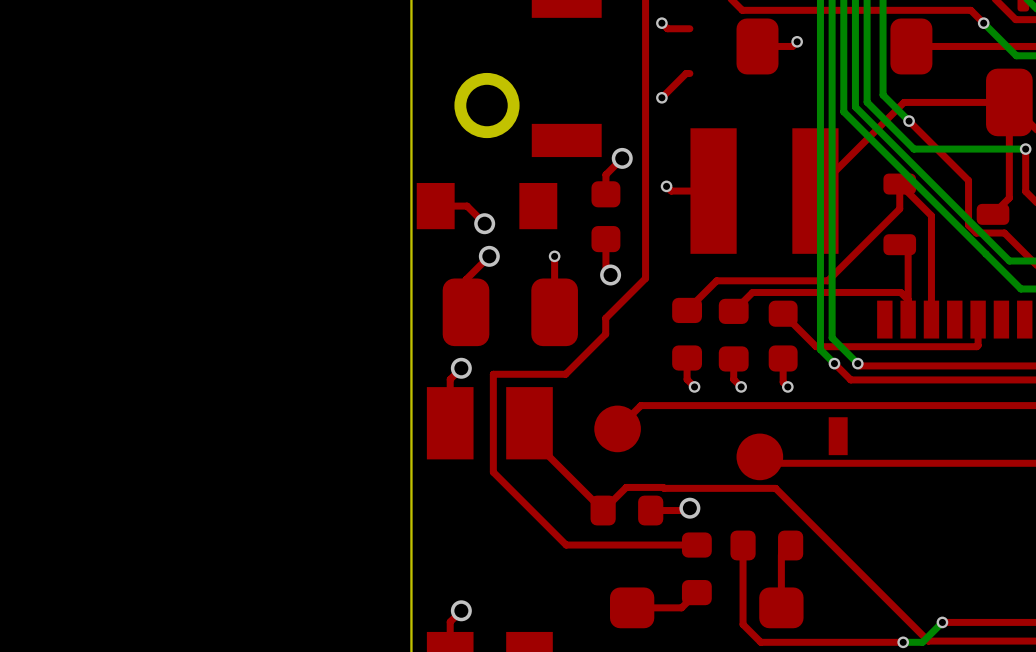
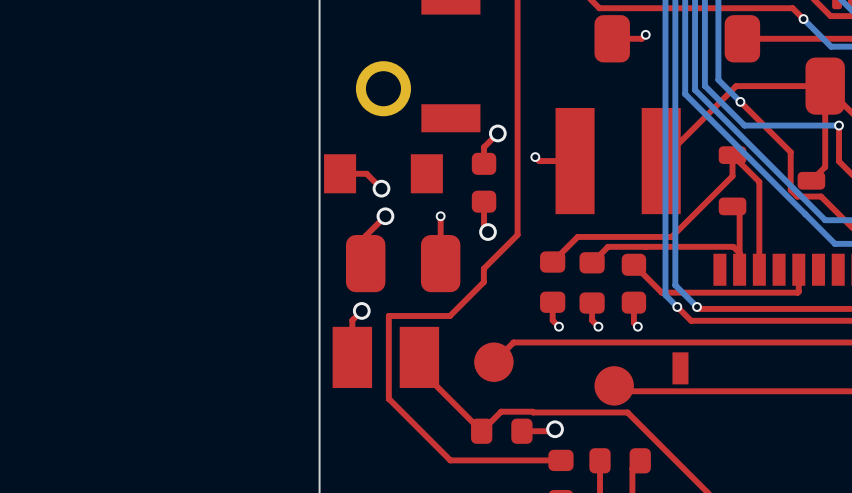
top track: (661, 23) (667, 28) (689, 28) -> none
via: (661, 23) -> none
top track: (689, 73) (686, 73) (661, 97) -> none
via: (661, 97) -> none

